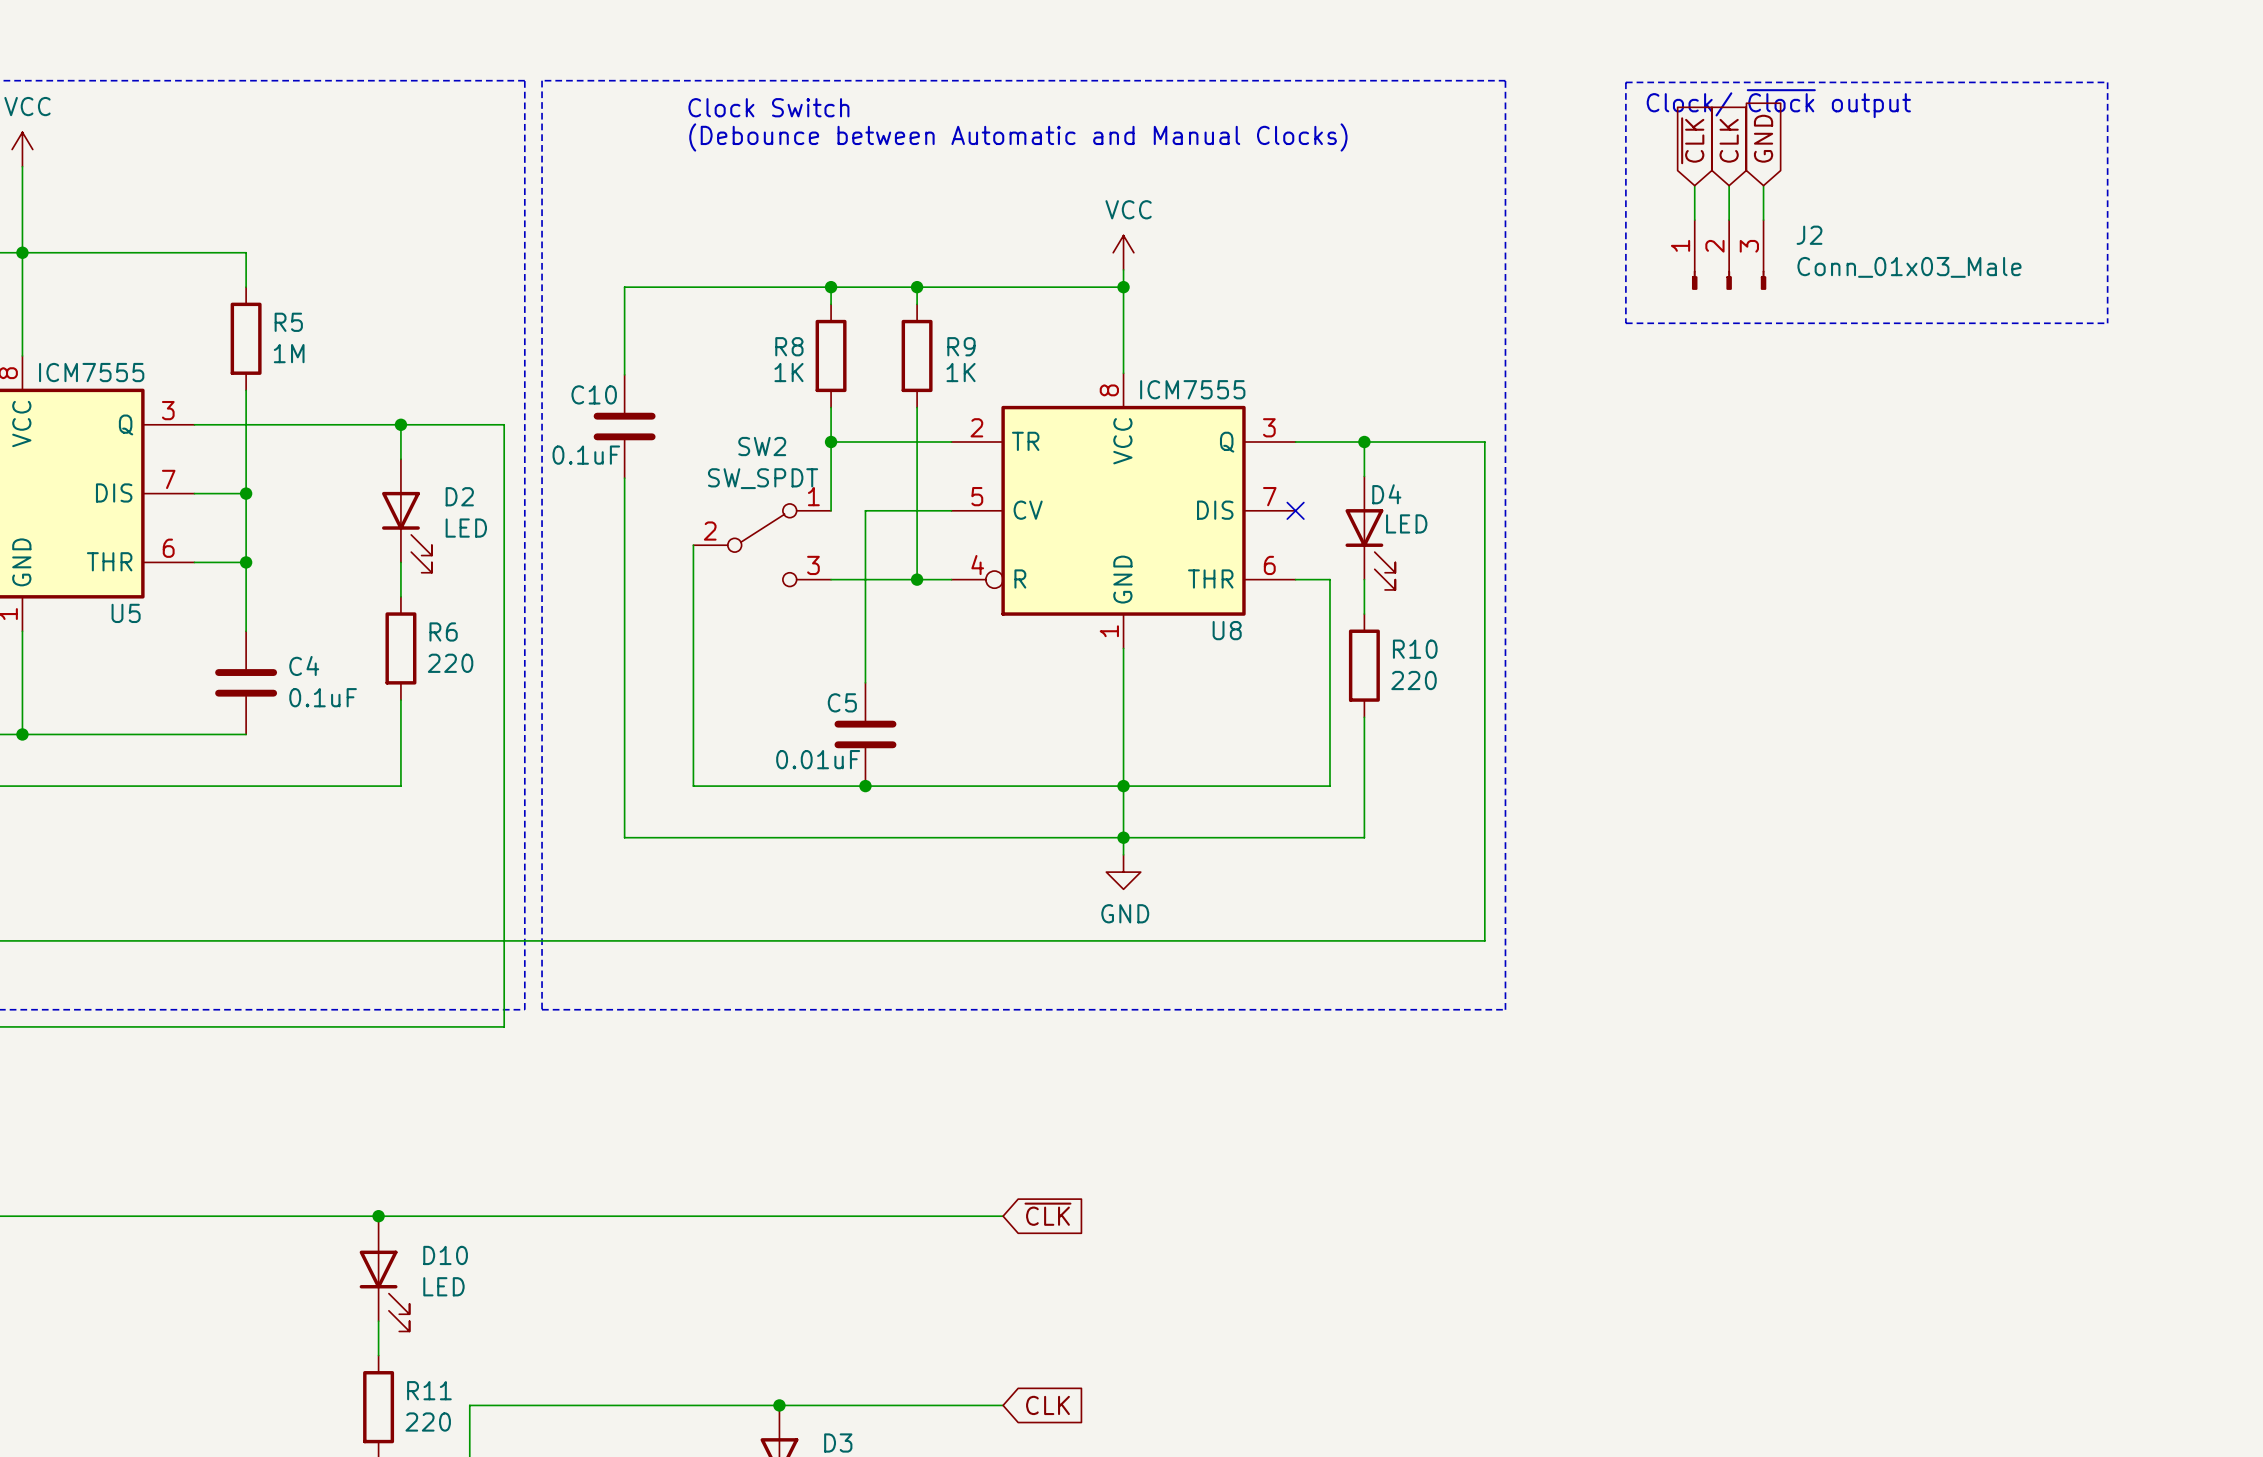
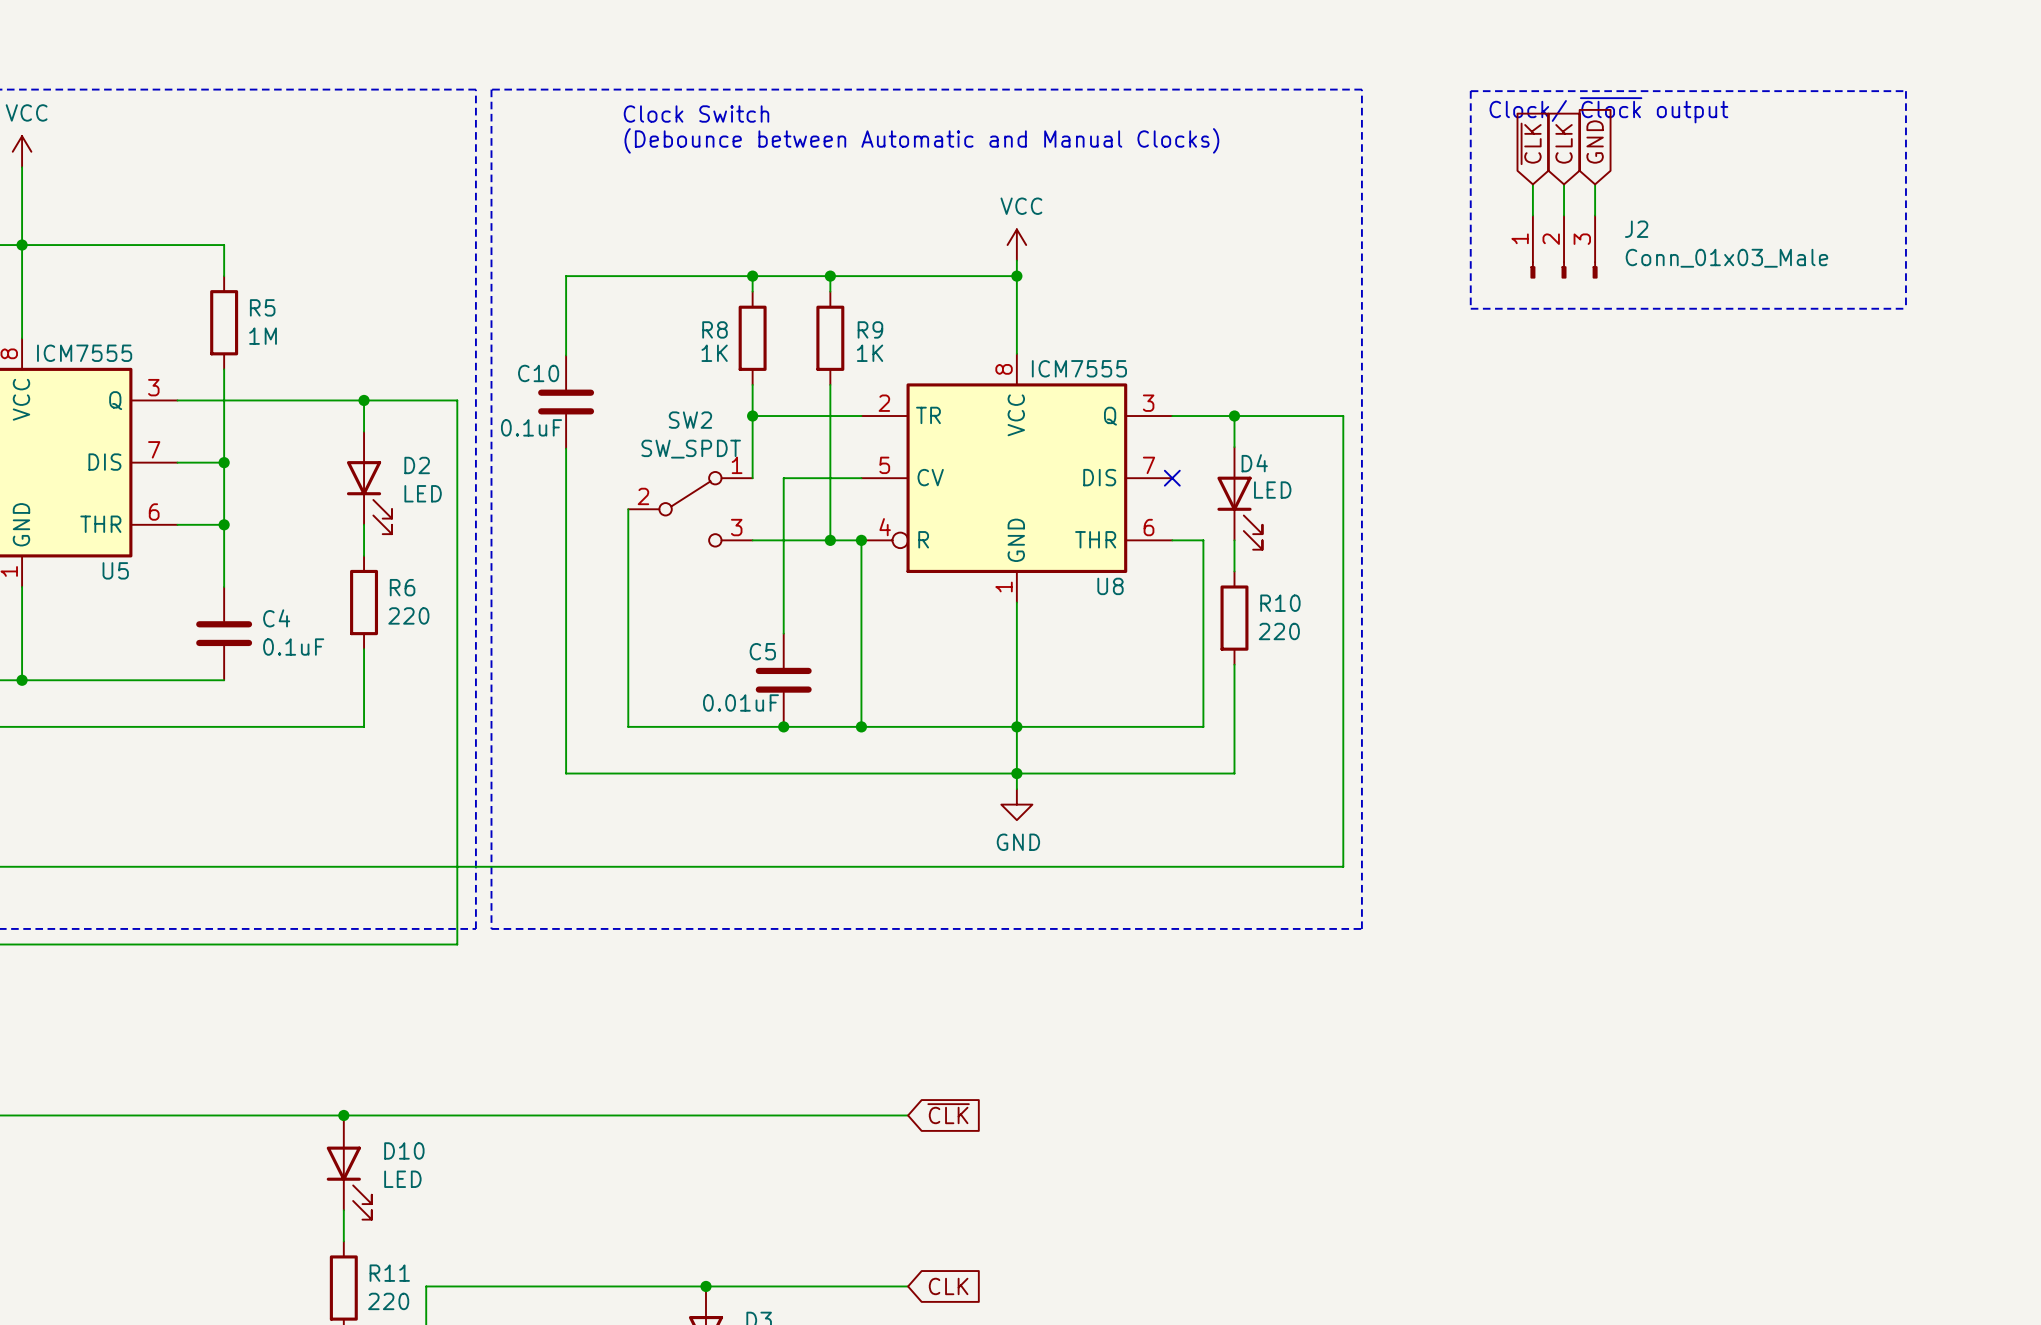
wire: none -> (861, 540) (861, 726)
junction: none -> (861, 540)
junction: none -> (861, 726)

